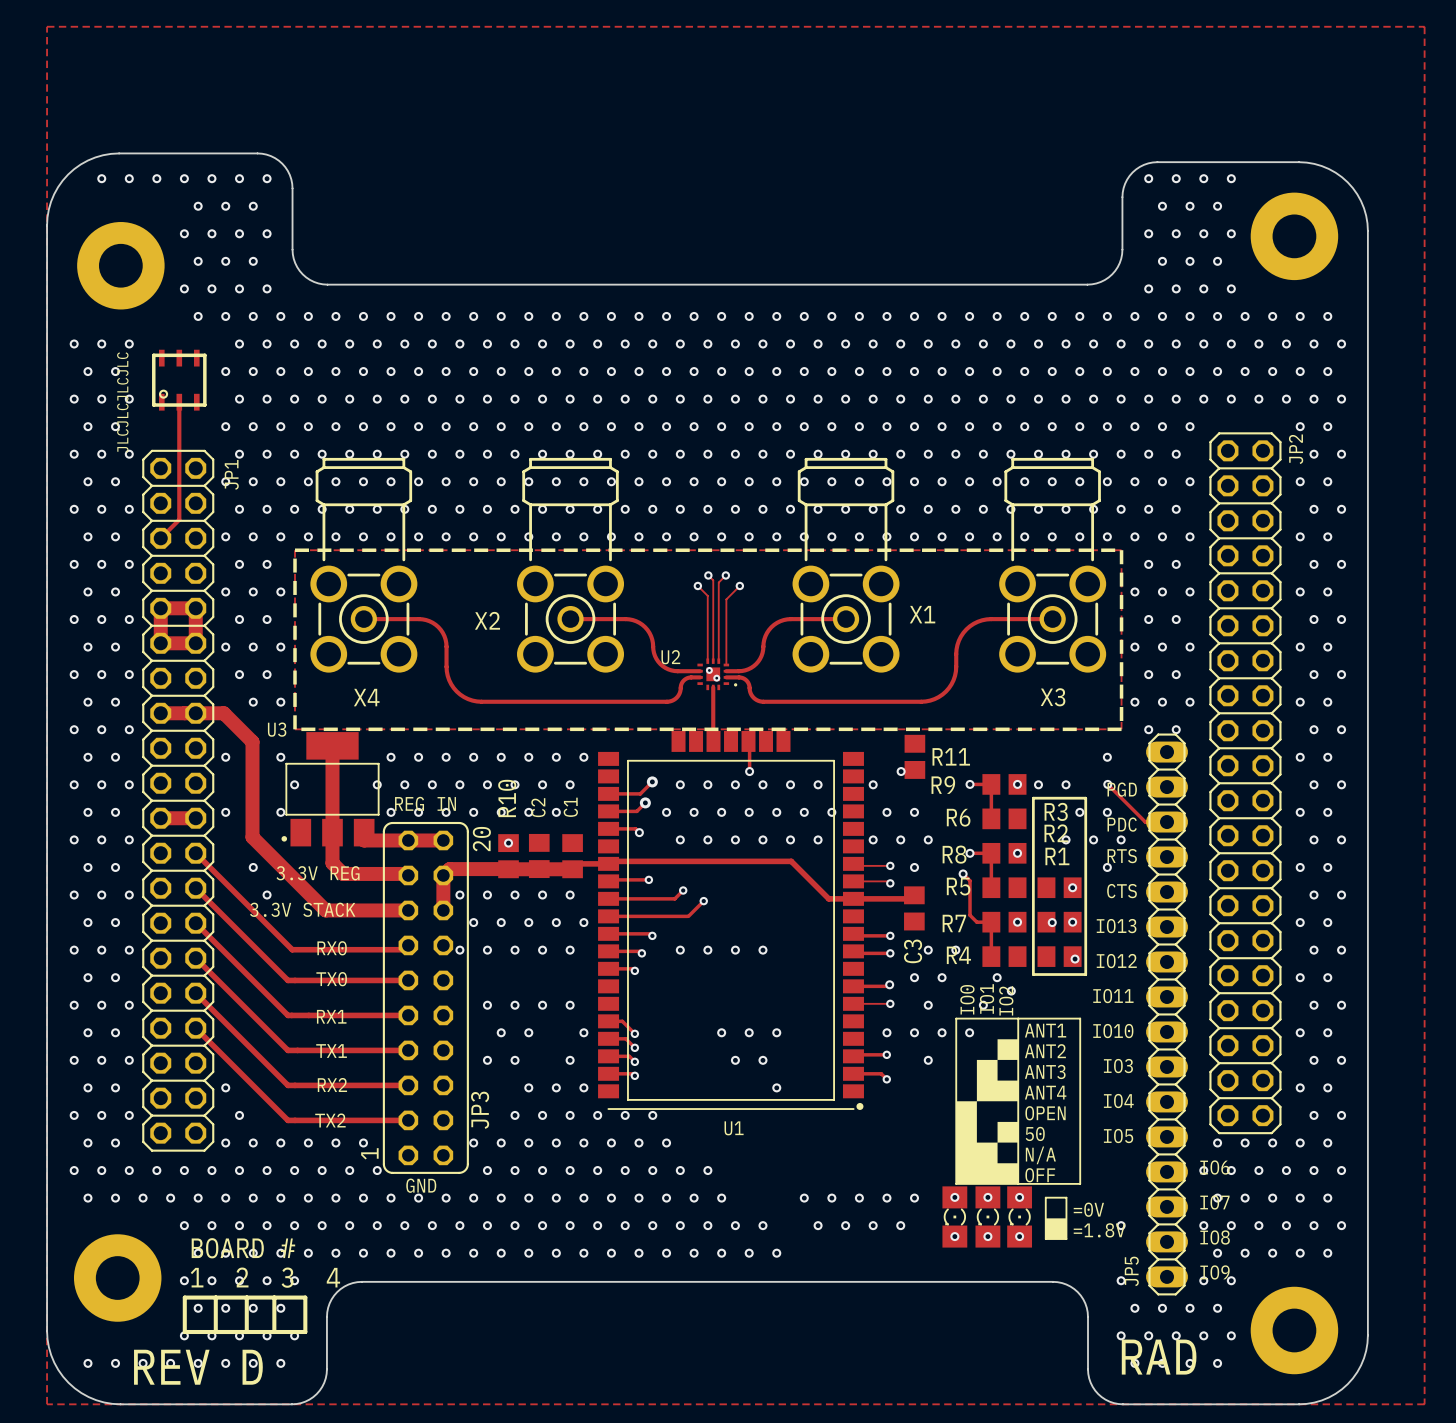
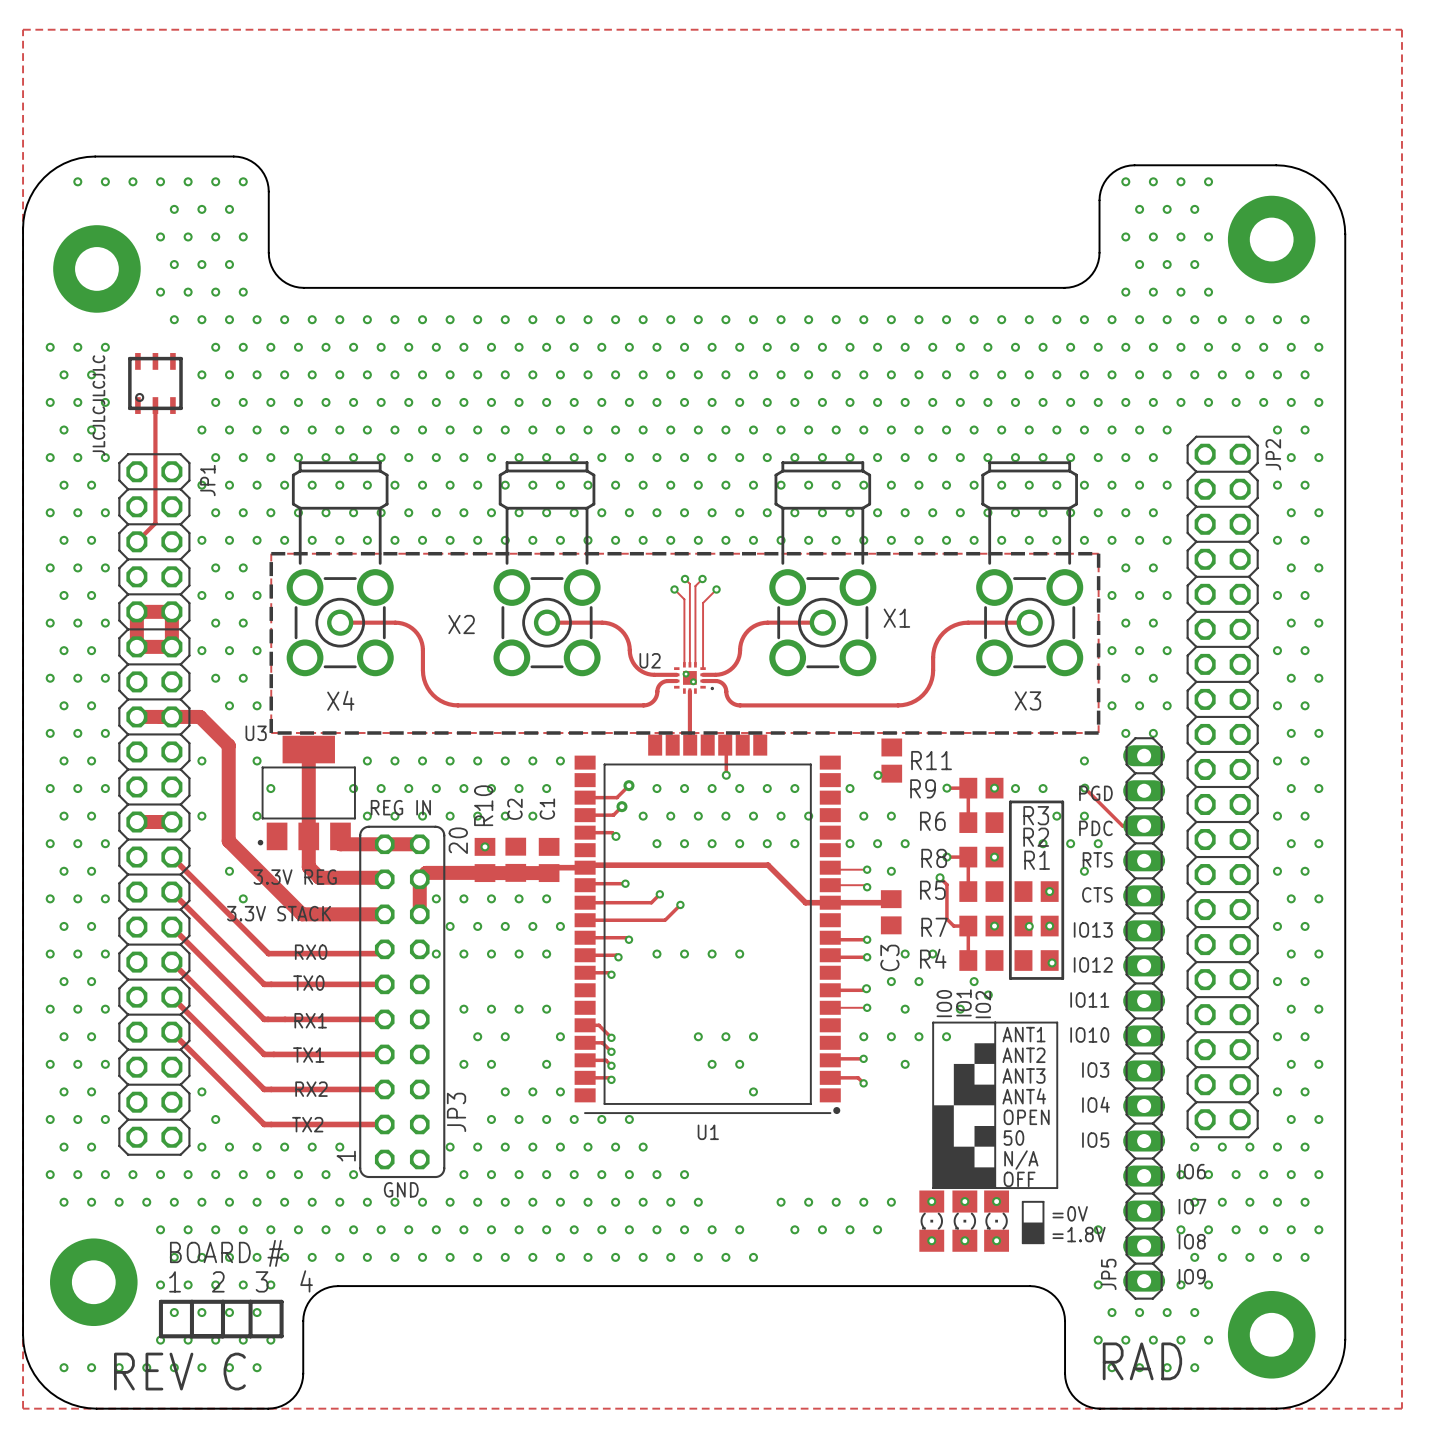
text: REV D (198, 1367) -> REV C (179, 1371)

